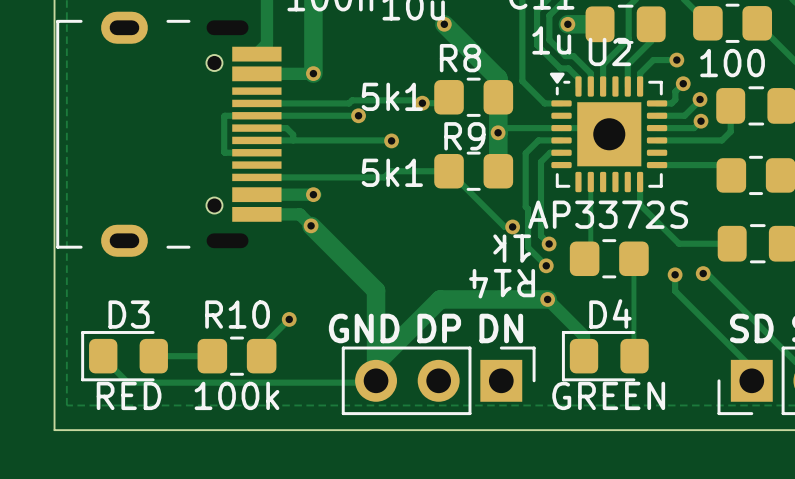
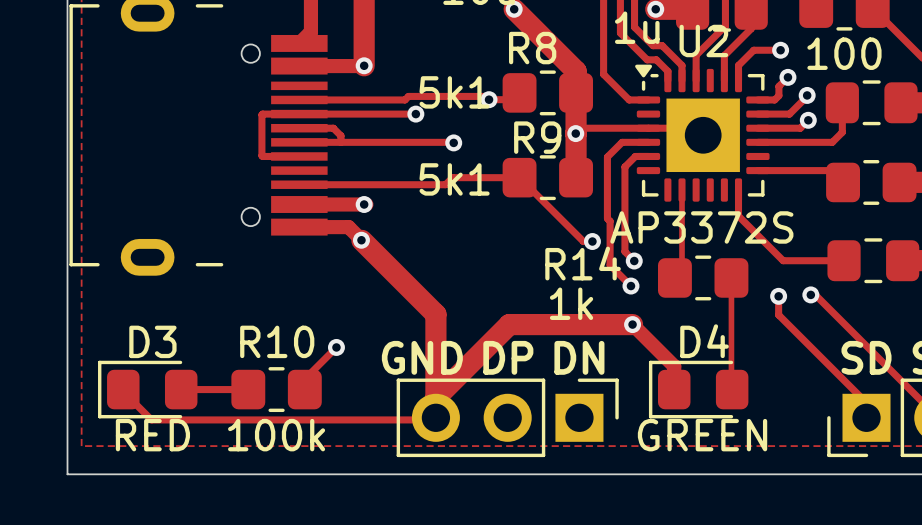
R14 value rotation: 0° (512, 248) -> 180° (571, 303)
R14 name rotation: 0° (502, 283) -> 180° (583, 263)

